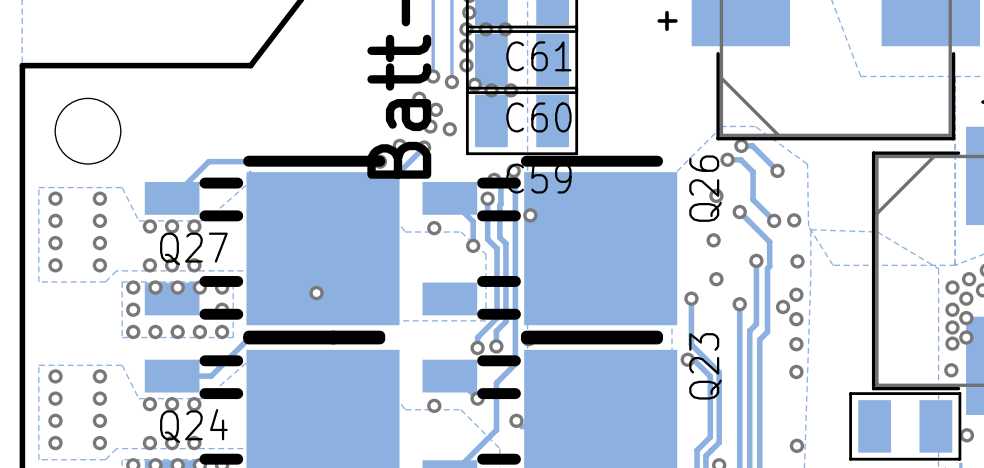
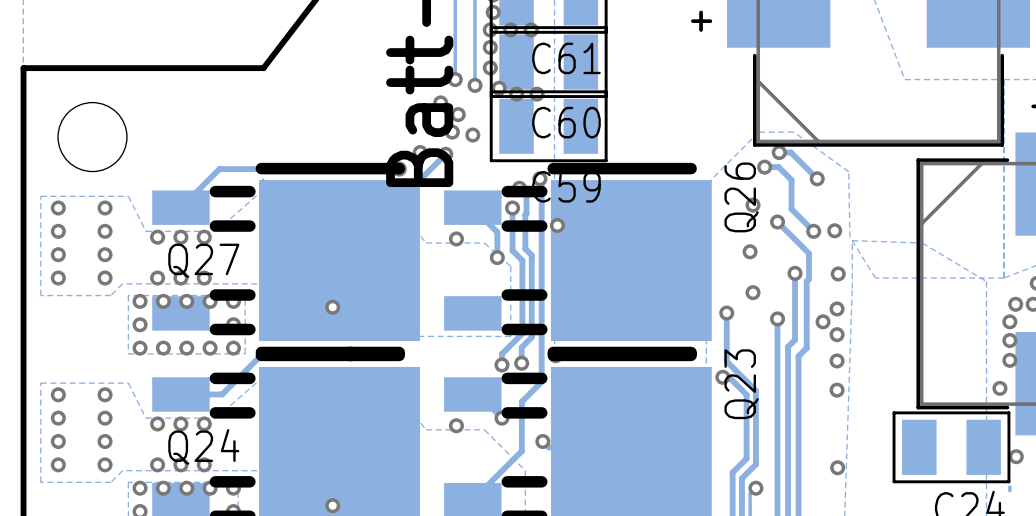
via: (969, 279) -> none
via: (952, 287) -> none
via: none -> (1015, 304)
via: (966, 298) -> none
via: none -> (1009, 321)
via: (952, 309) -> none
via: (966, 318) -> none
via: none -> (1009, 340)
via: (952, 327) -> none
via: (966, 337) -> none
via: (952, 343) -> none
via: none -> (1009, 360)

